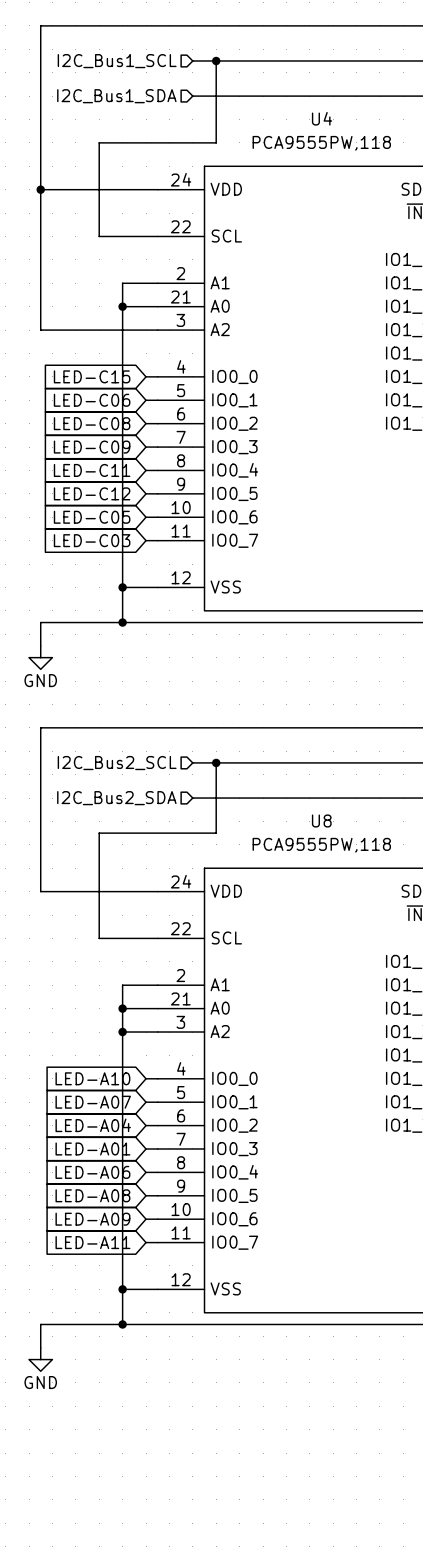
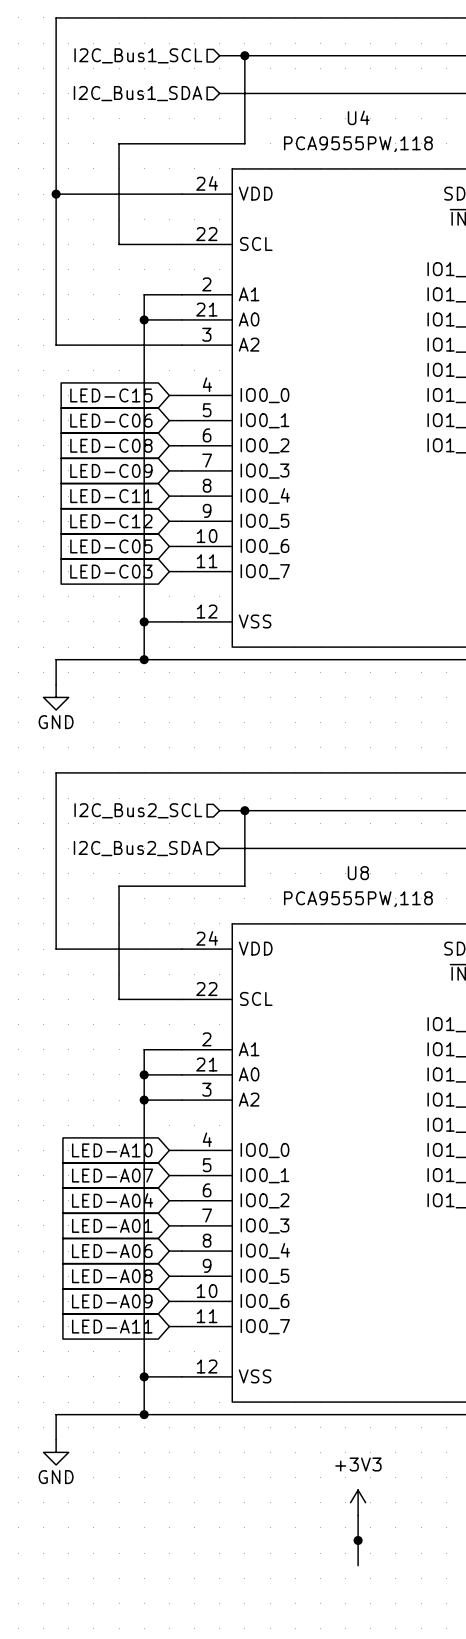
power symbol: none -> +3V3 (358, 1502)
wire: none -> (358, 1515) (358, 1565)
junction: none -> (358, 1540)

